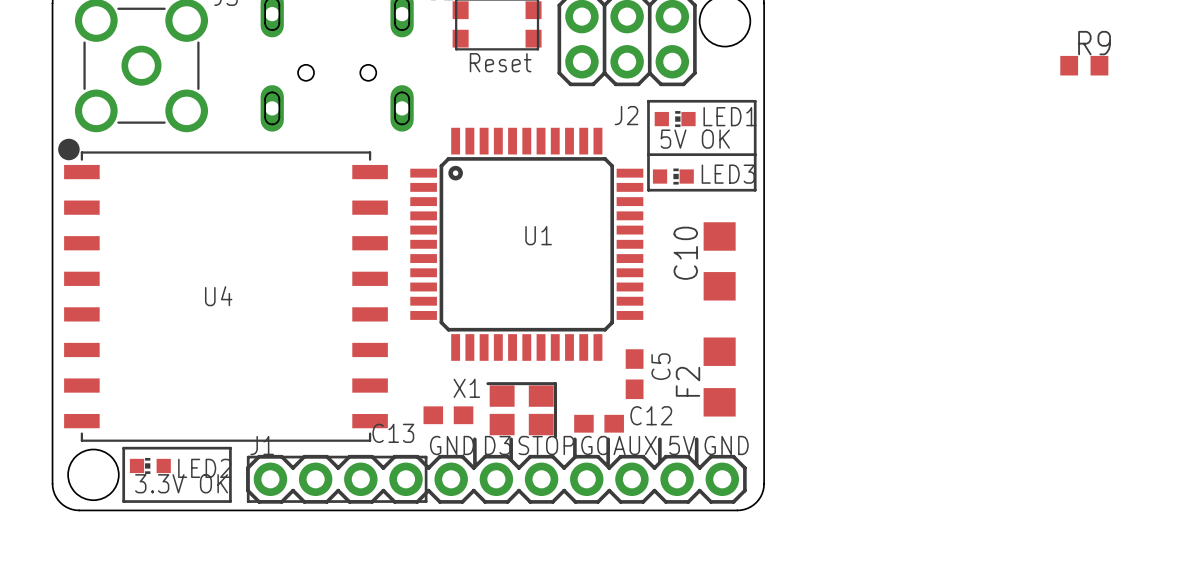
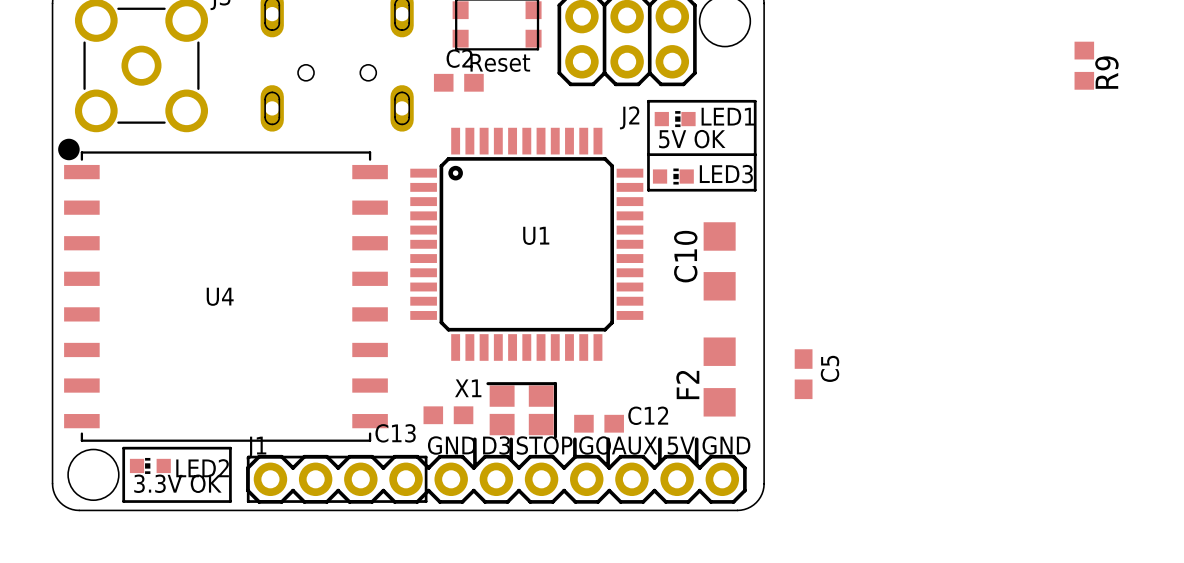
R9 rotation: 0° (1084, 65) -> 90° clockwise (1084, 65)
C2: none -> (458, 82)
C5 position: (634, 374) -> (803, 374)

